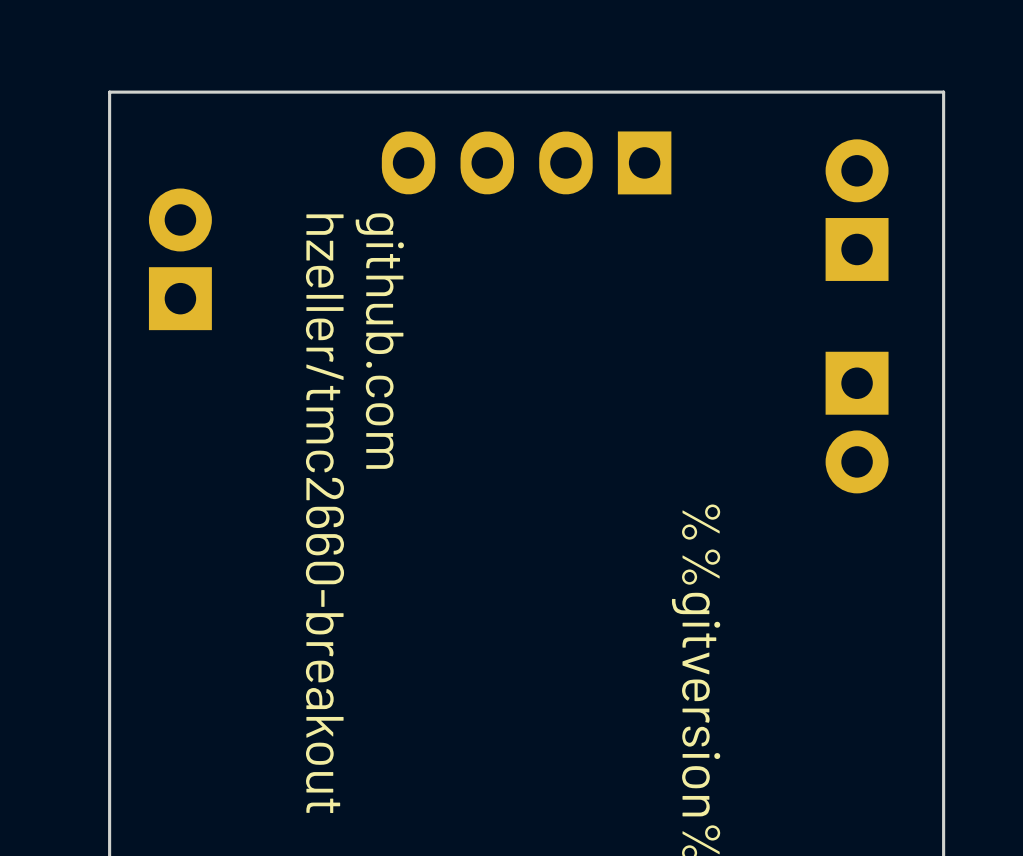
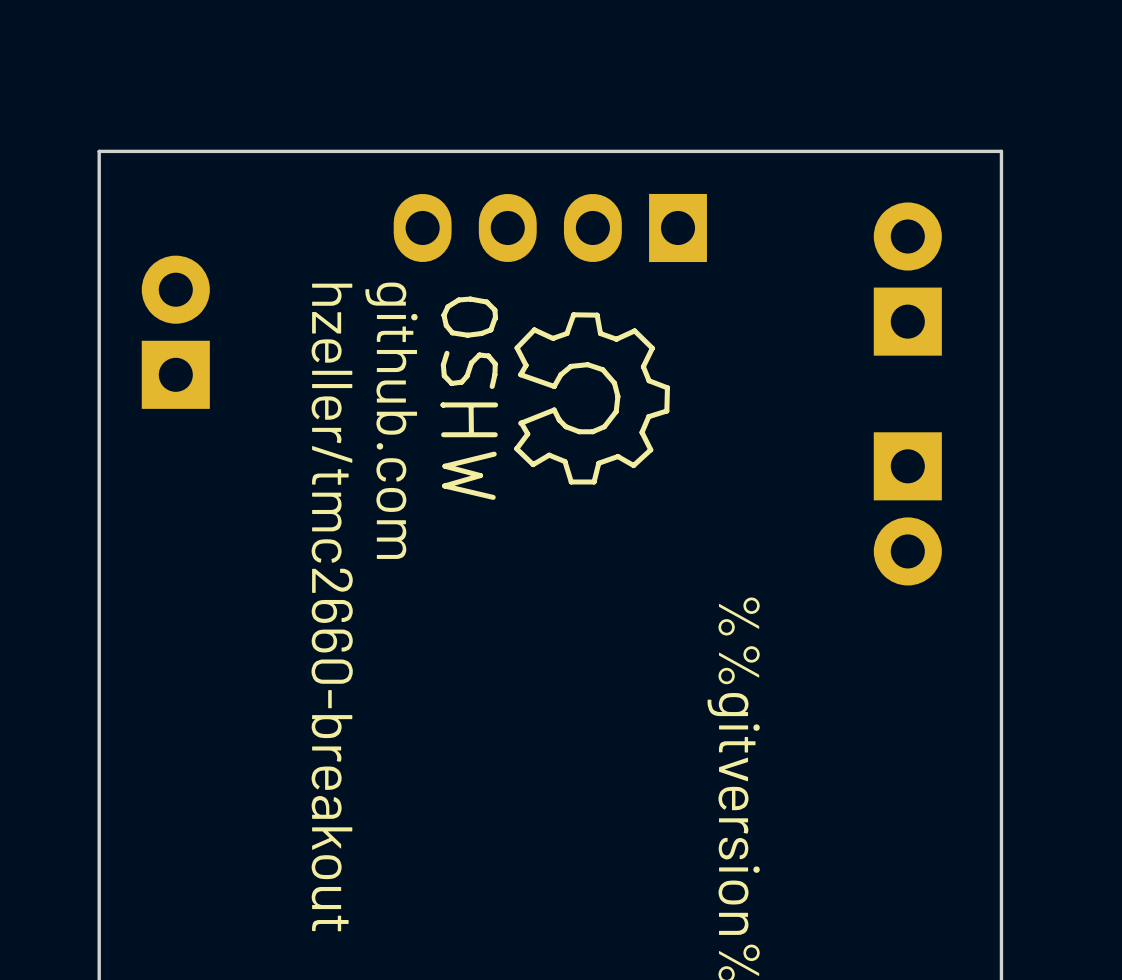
drawing: none -> [440, 296, 670, 500]

